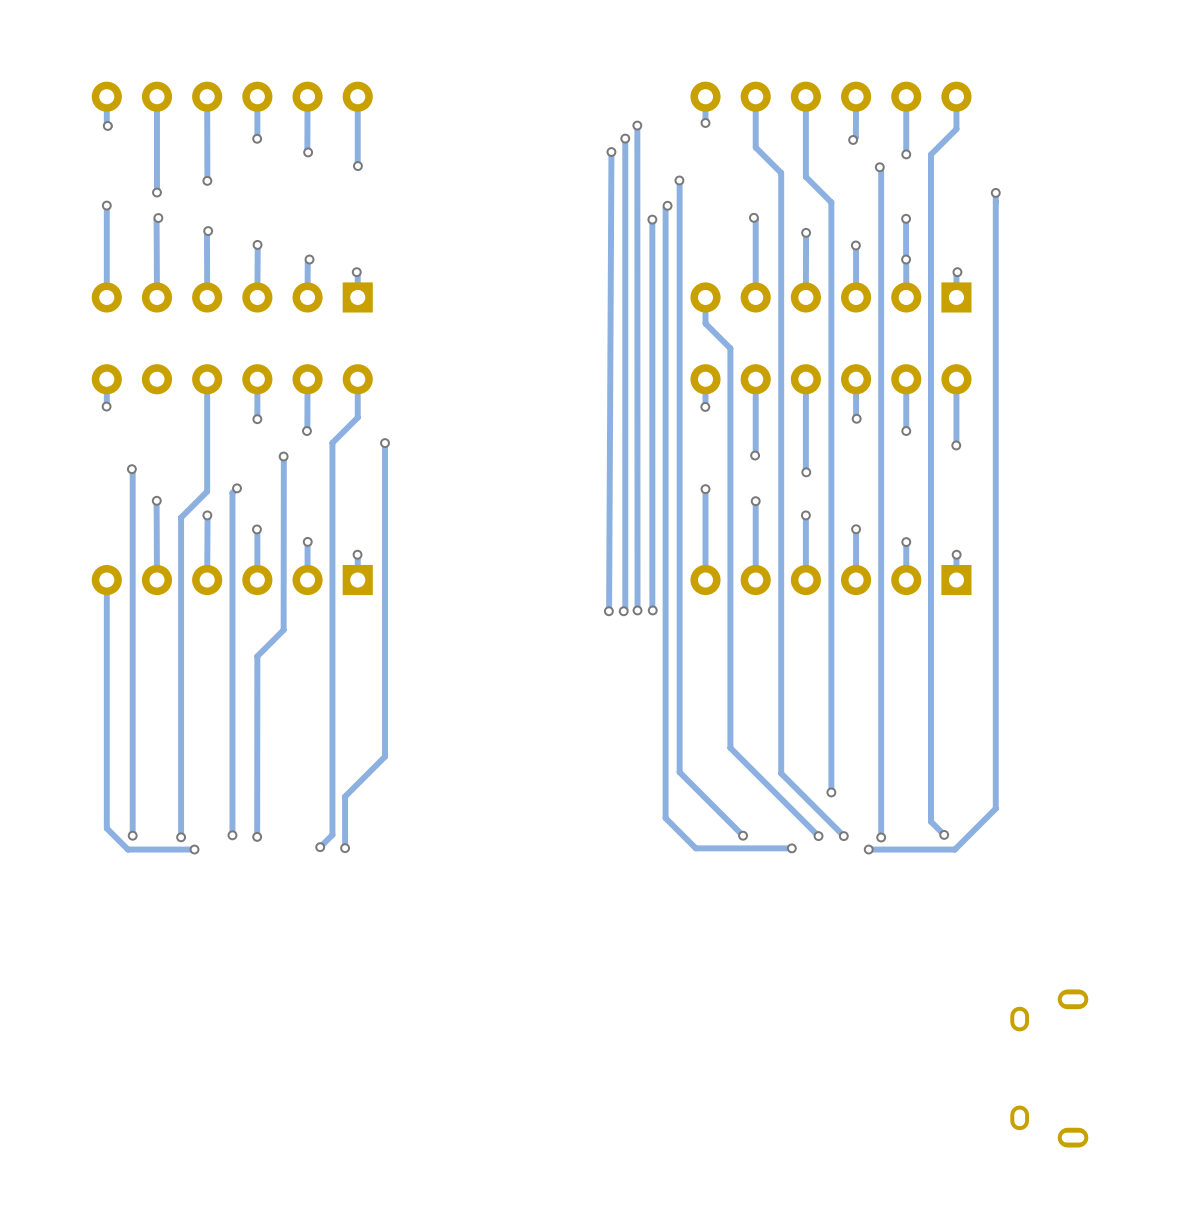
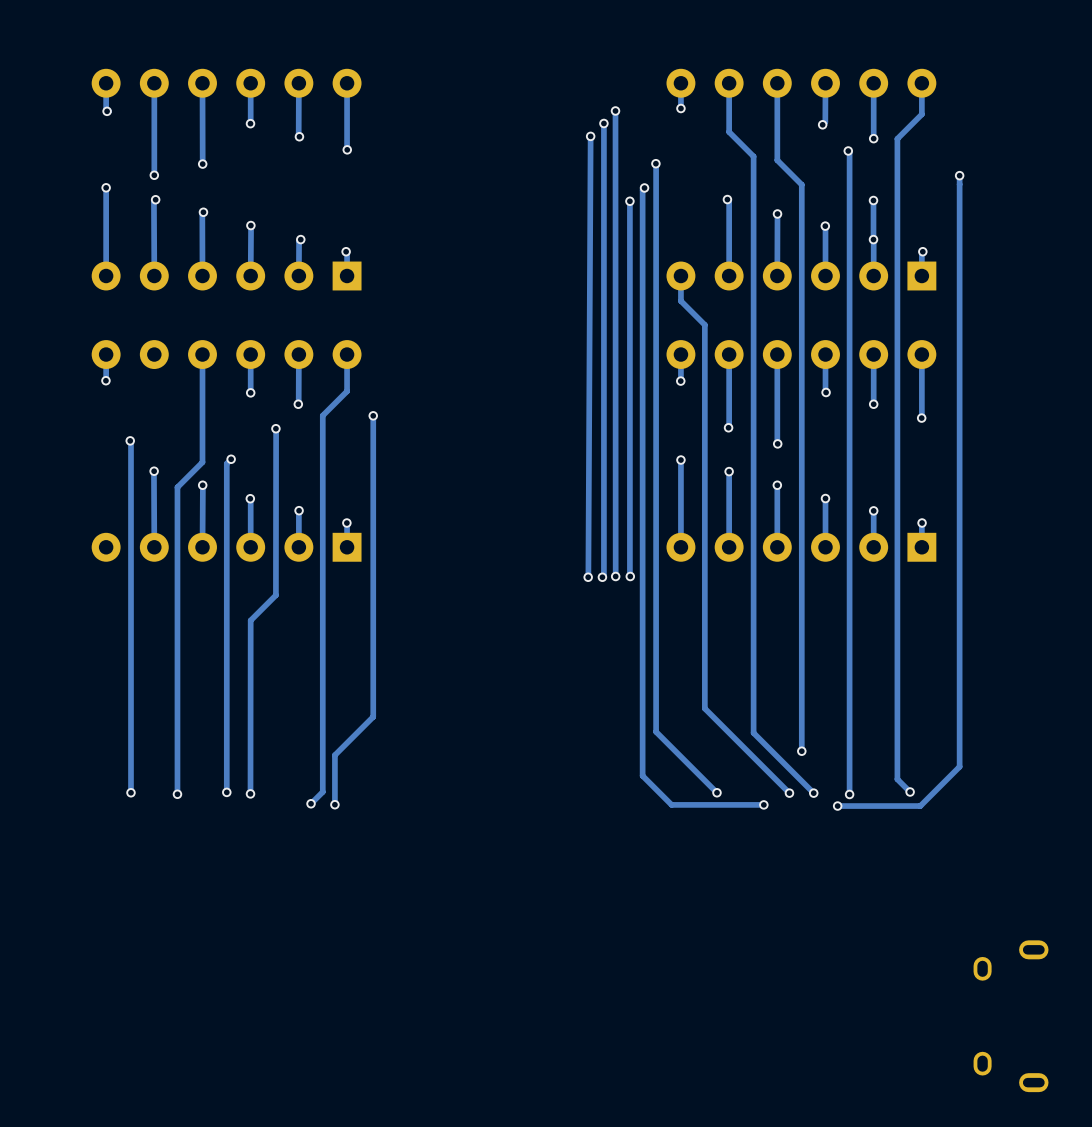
track: (106, 580) (106, 828) (127, 849) (194, 849) -> none
via: (194, 849) -> none

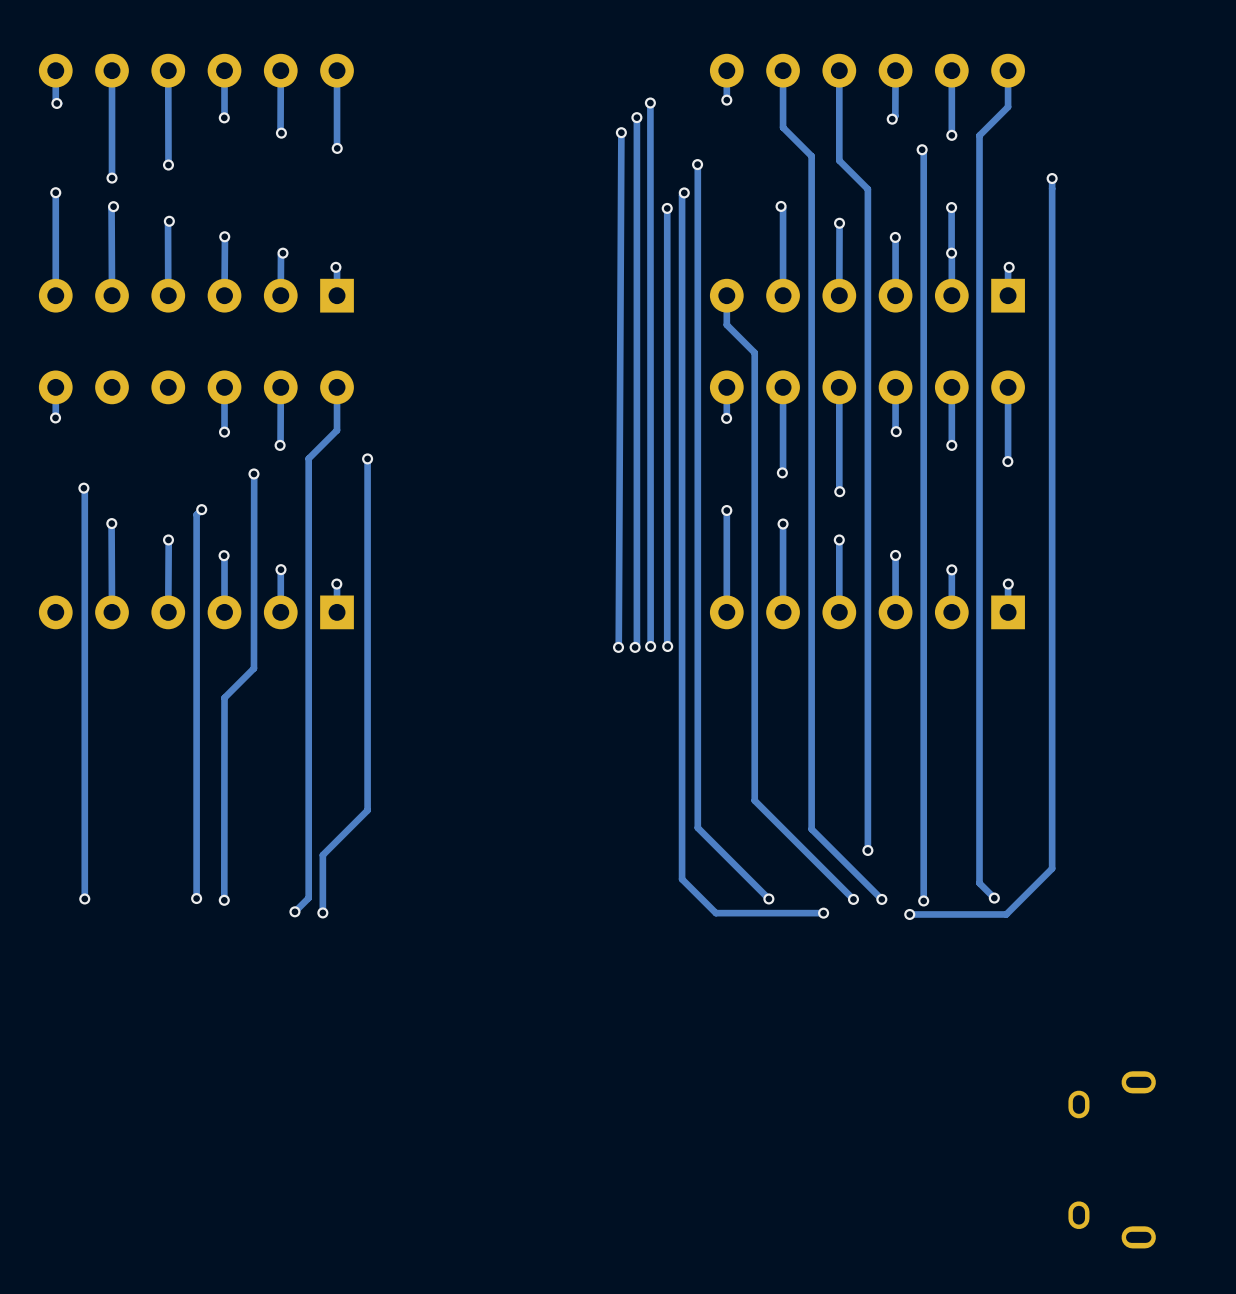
track: (202, 354) (202, 462) (177, 487) (177, 794) -> none
via: (177, 794) -> none

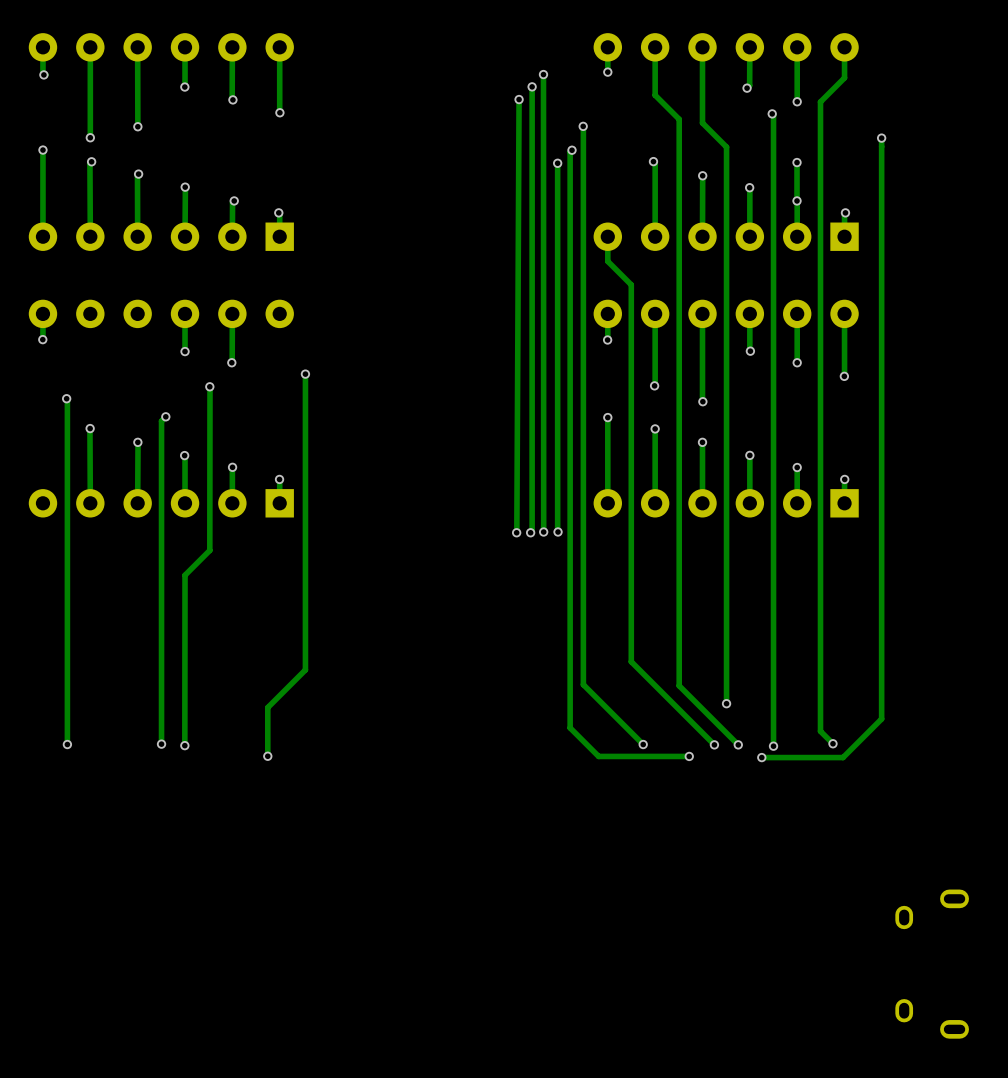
track: (337, 387) (337, 430) (308, 458) (308, 898) (294, 911) -> none
via: (294, 911) -> none

